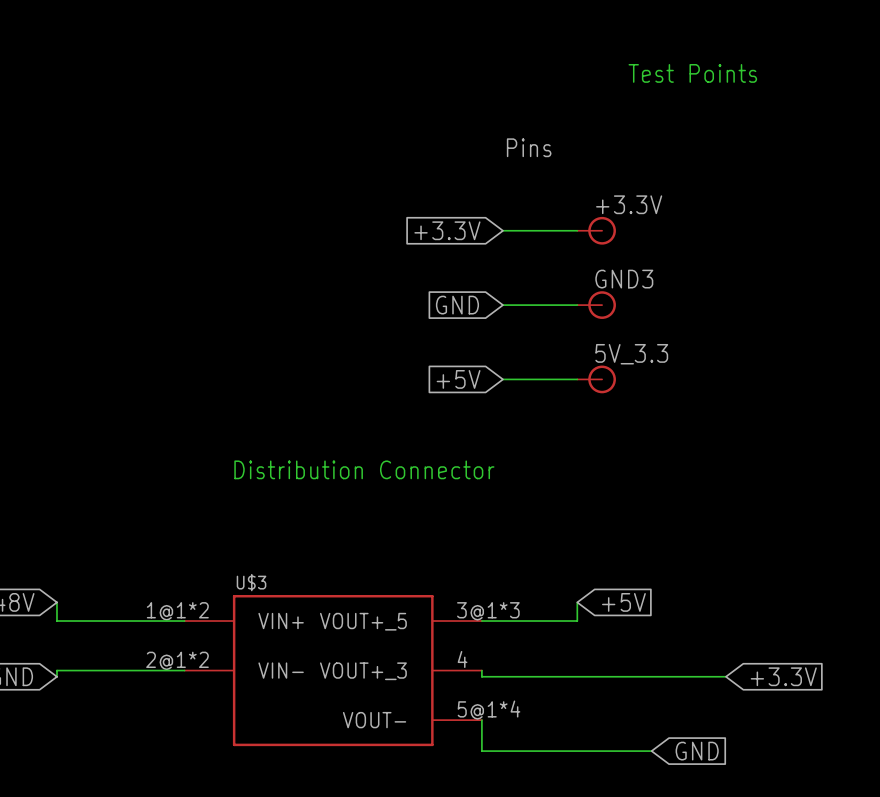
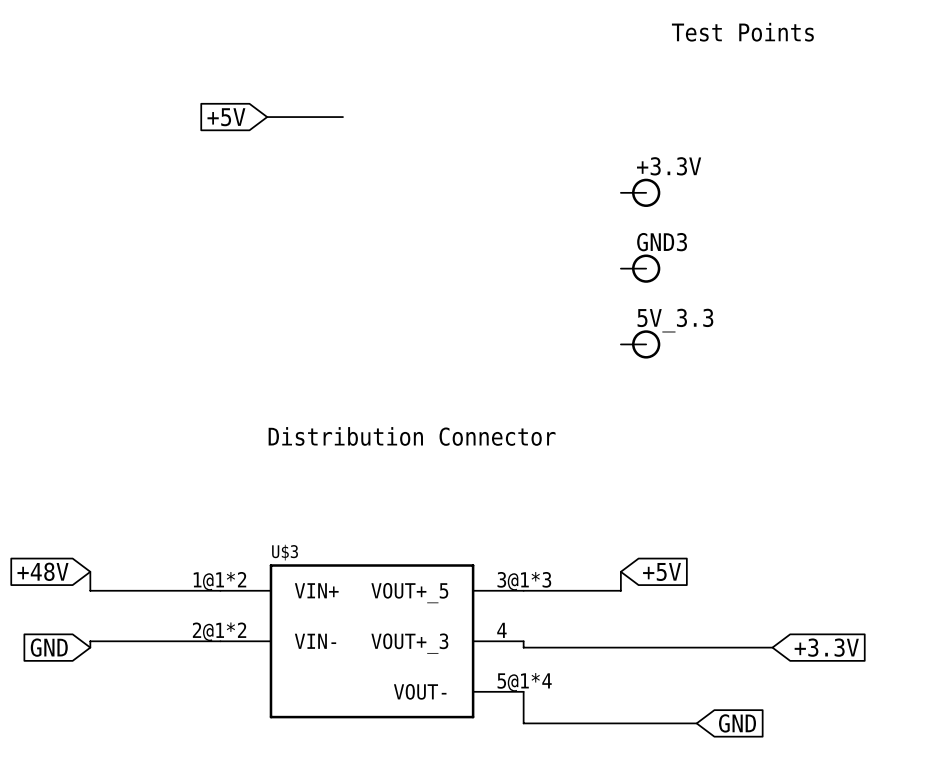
text: Pins (529, 147) -> none
global label: none -> +5V (226, 117)
wire: none -> (267, 117) (342, 117)
global label: +3.3V (447, 230) -> none
wire: (502, 230) (577, 230) -> none
global label: GND (457, 305) -> none
wire: (502, 305) (577, 305) -> none
global label: +5V (458, 379) -> none
wire: (502, 379) (577, 379) -> none

